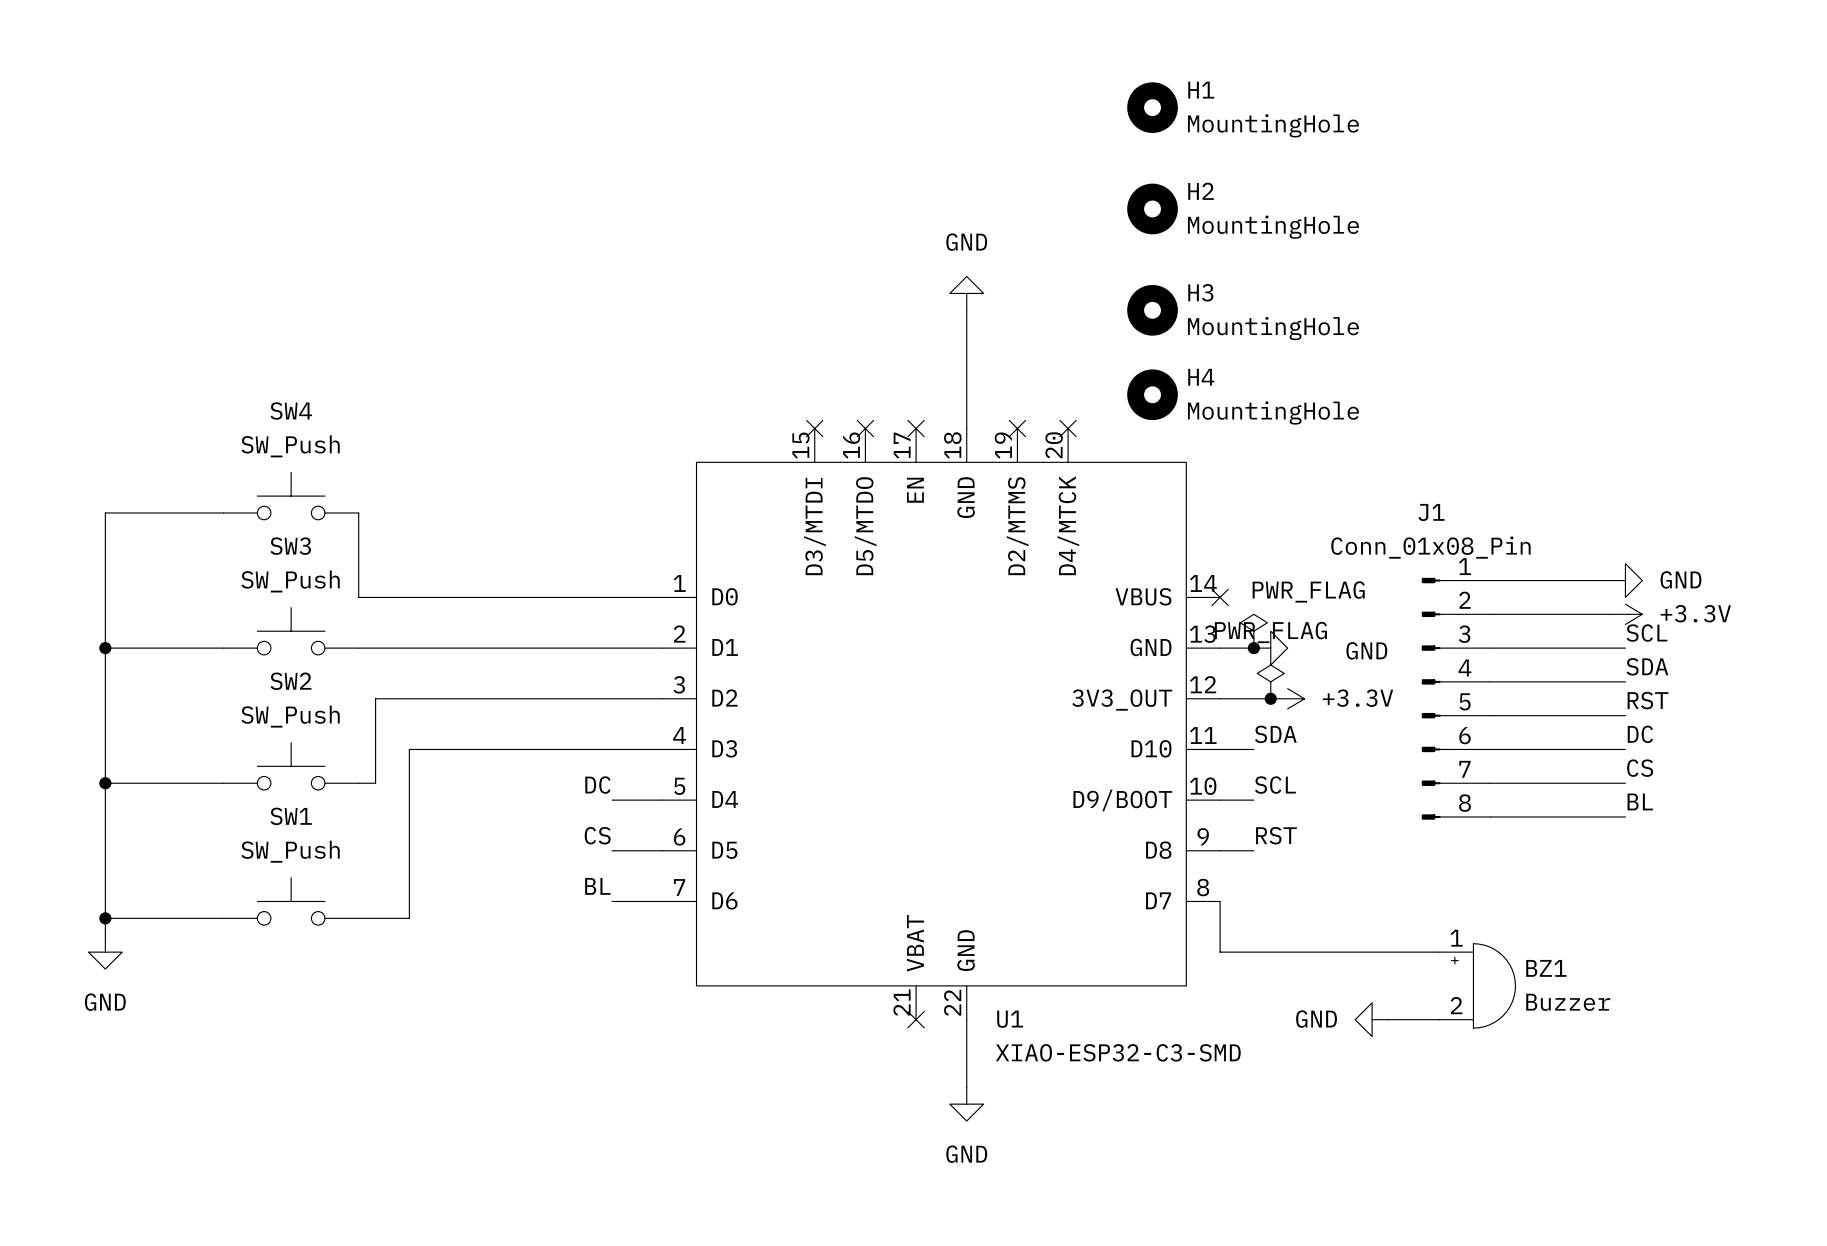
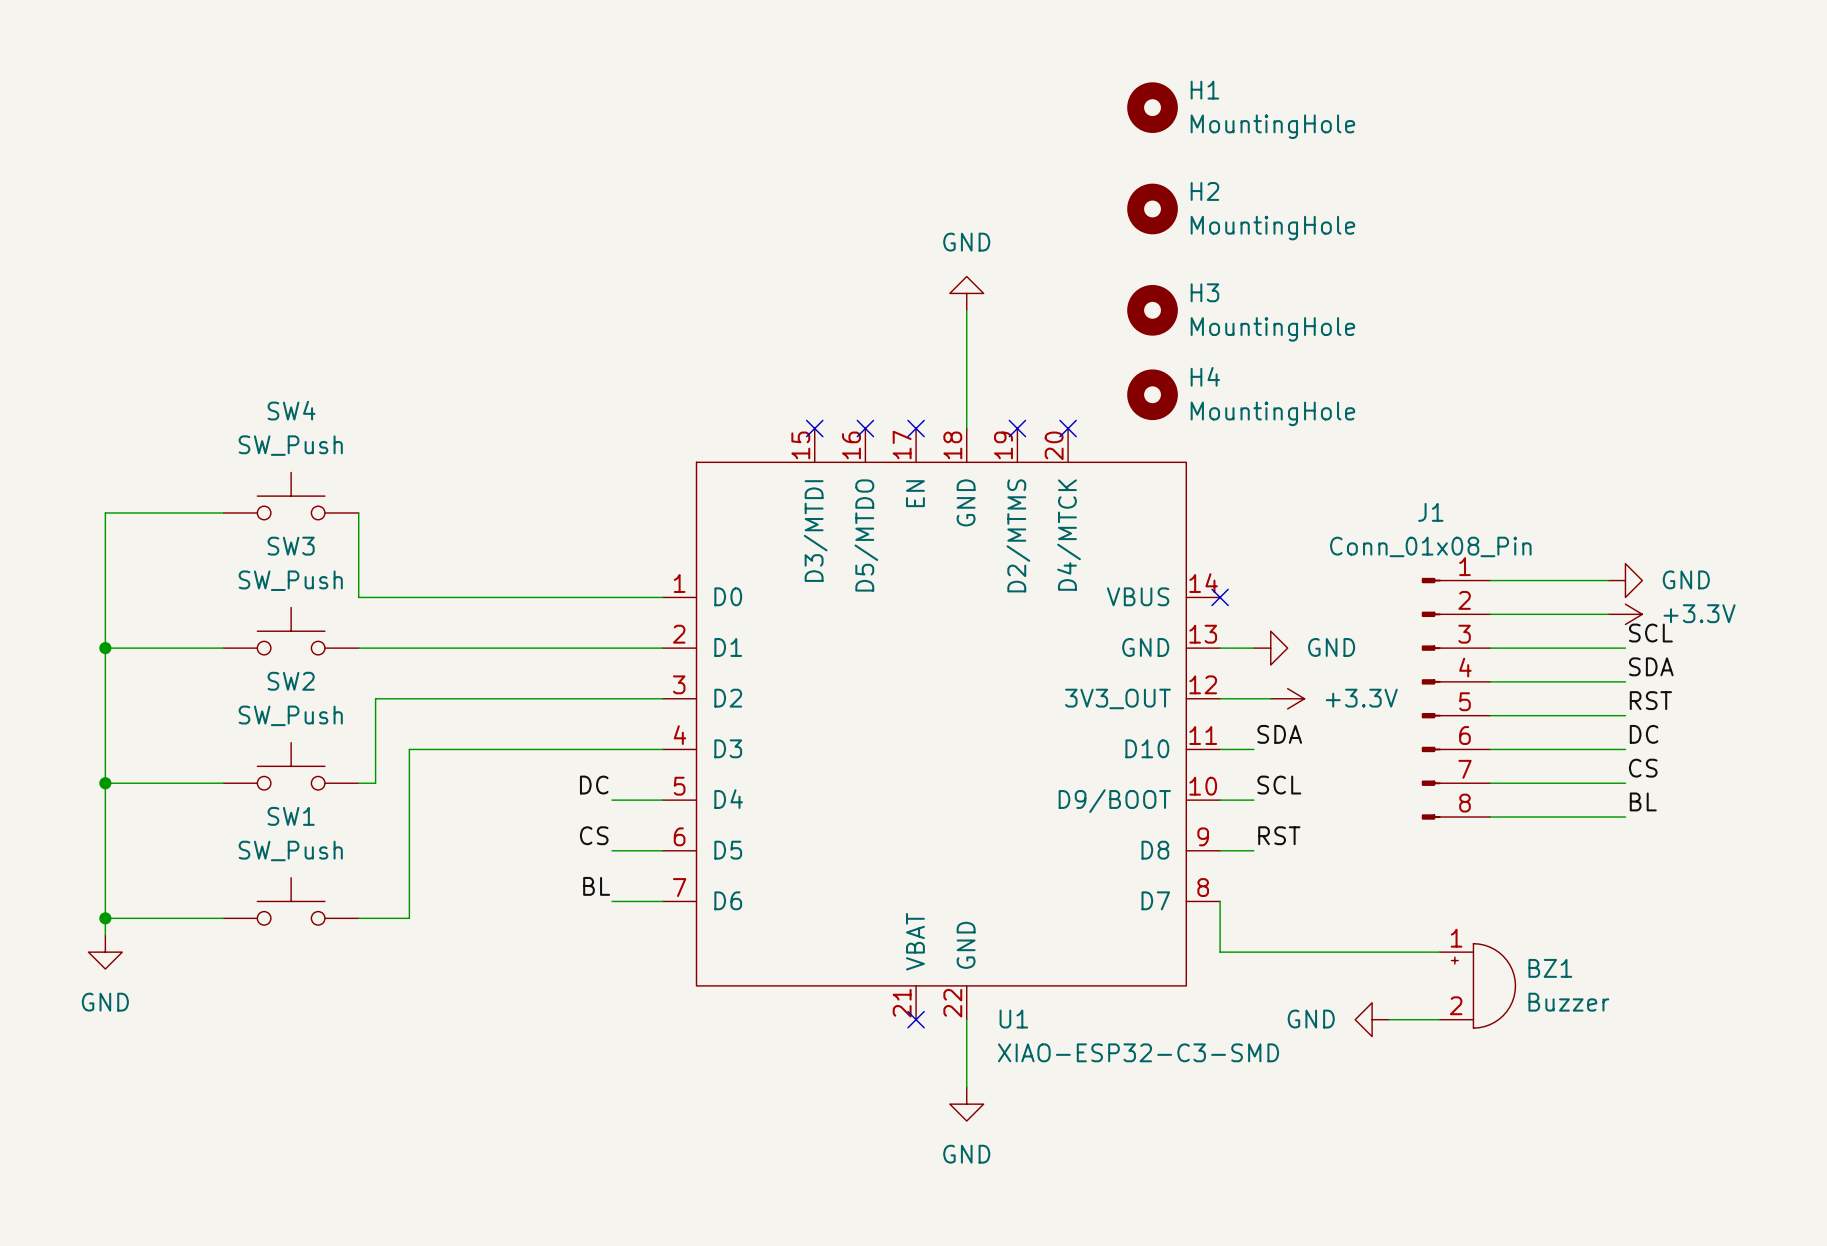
power symbol: PWR_FLAG (1253, 631) -> none
junction: (1253, 648) -> none
power symbol text position: GND (1366, 650) -> GND (1331, 647)
power symbol: PWR_FLAG (1270, 681) -> none
junction: (1270, 698) -> none

